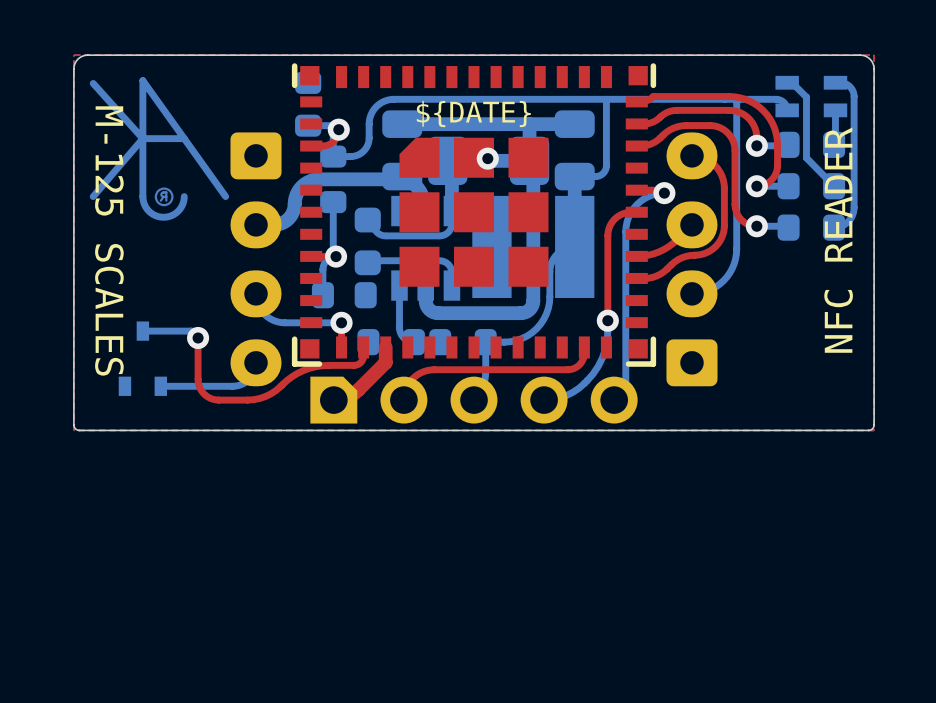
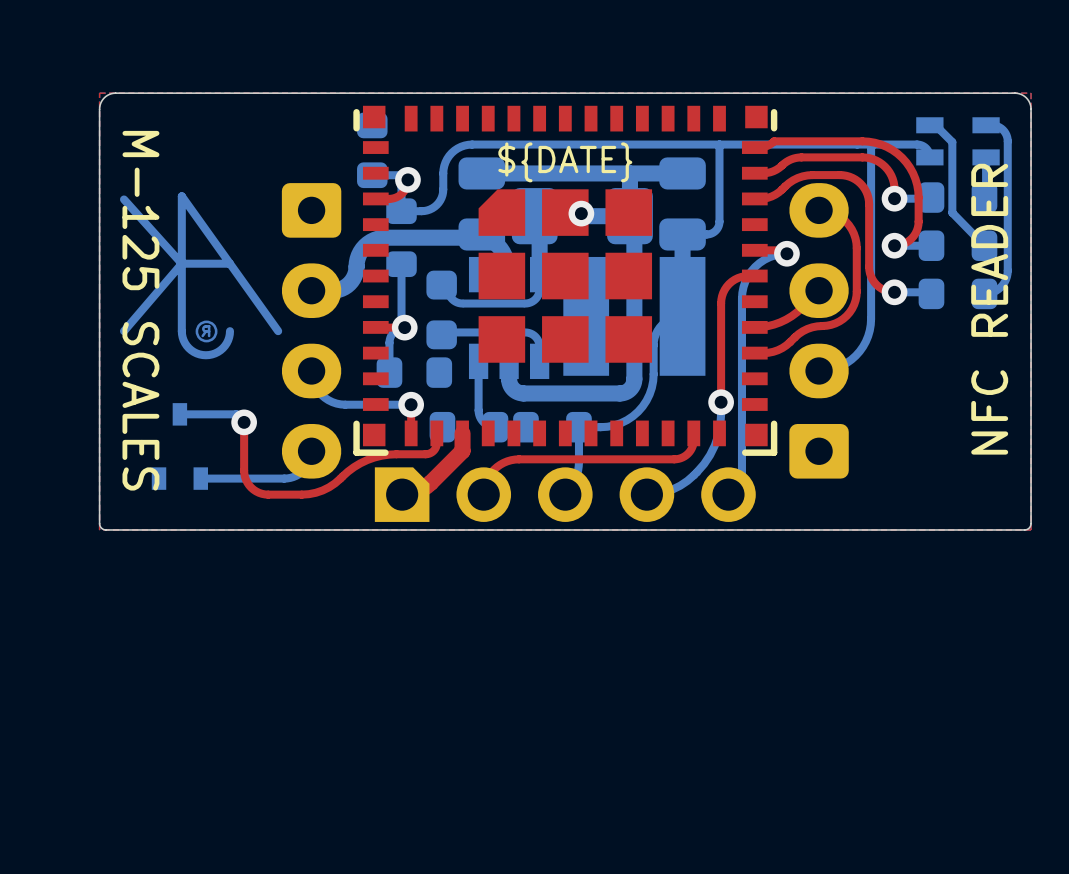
part footprint: [291, 63, 657, 367] -> [353, 105, 778, 456]
drawing position: (159, 148) -> (201, 275)

